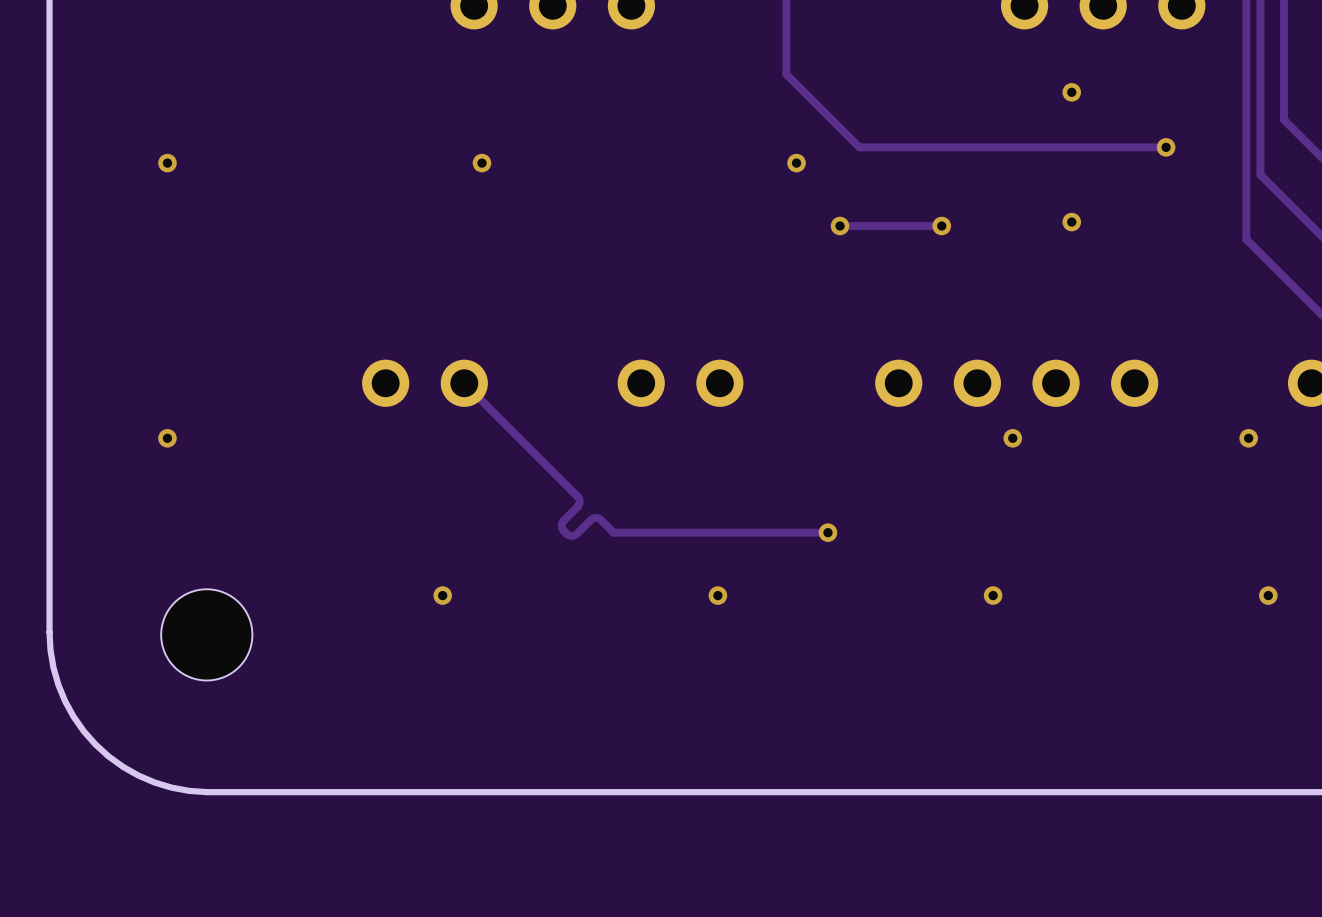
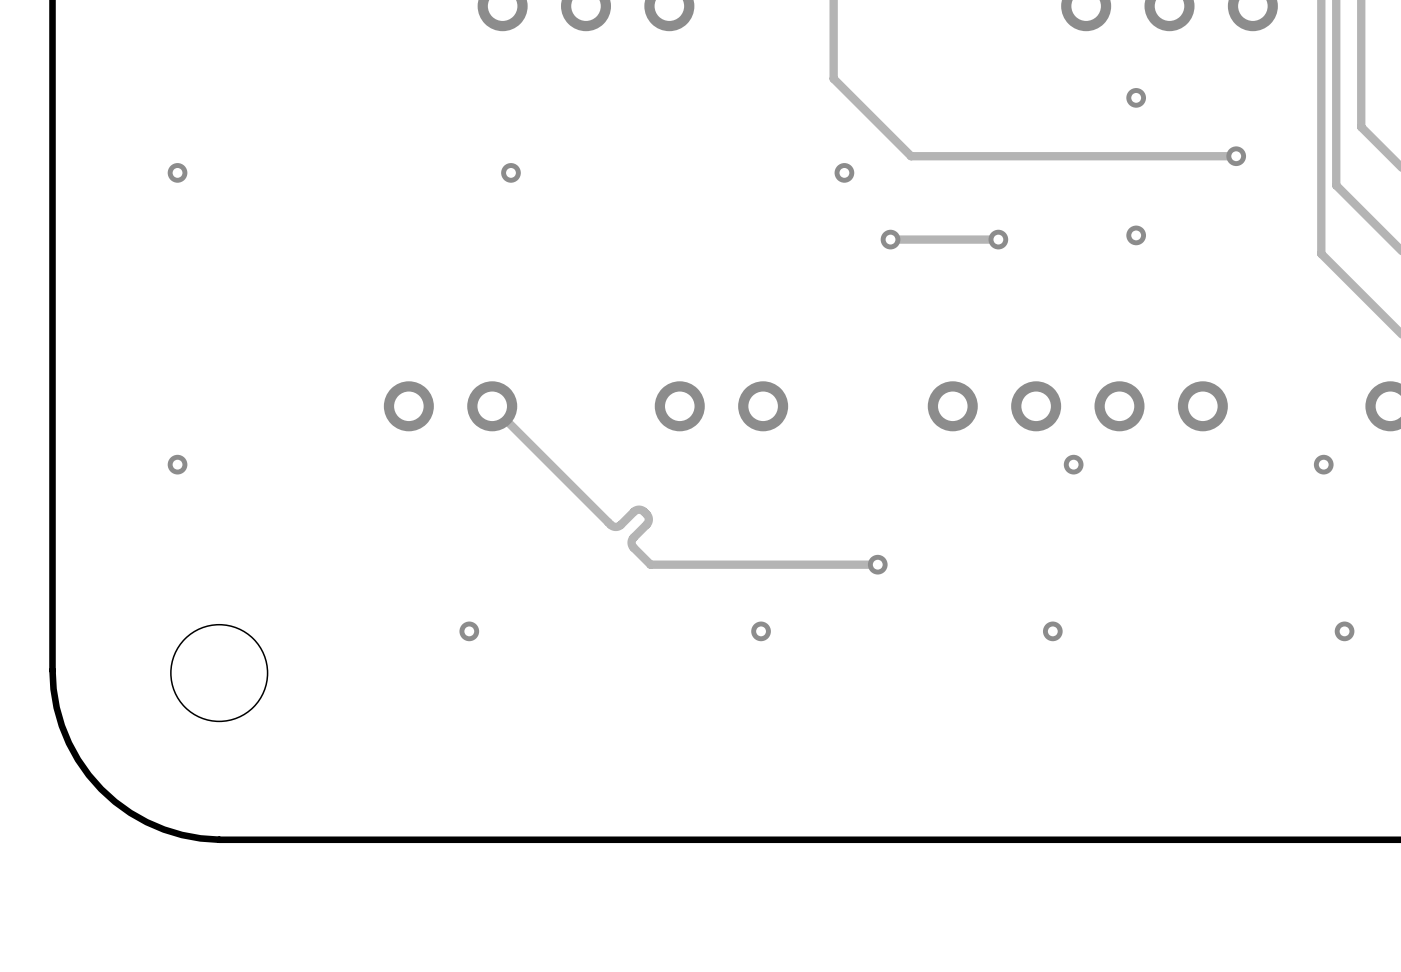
track: (576, 495) (579, 499) (578, 504) (561, 524) (562, 529) (566, 533) (570, 535) (575, 534) (593, 518) (601, 520) -> (610, 524) (615, 526) (619, 525) (636, 510) (642, 510) (646, 514) (647, 523) (631, 541) (632, 545) (637, 551)

